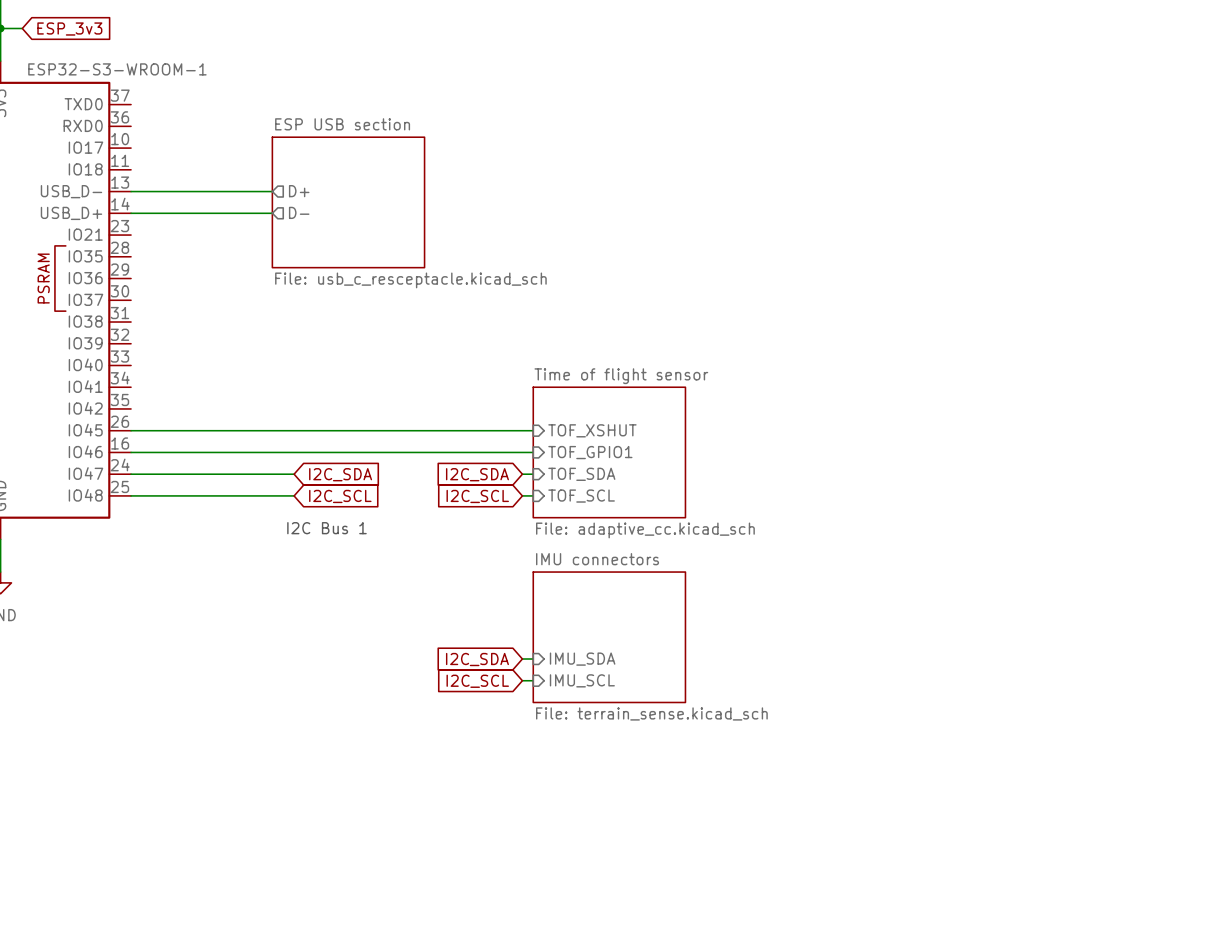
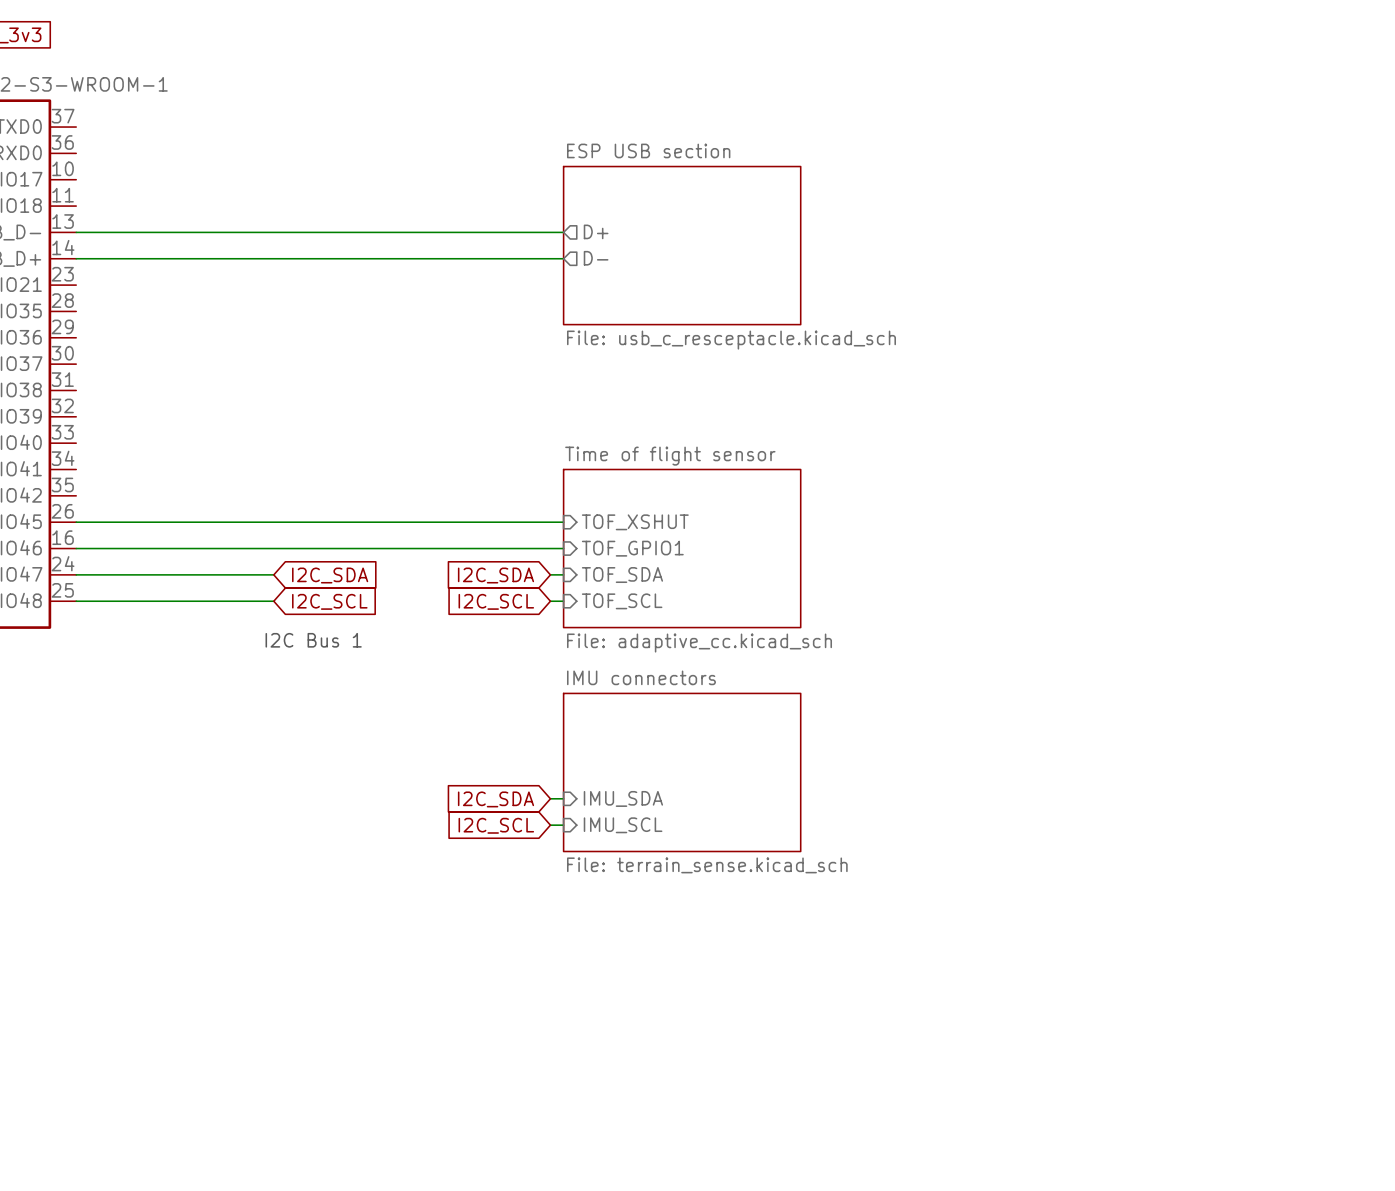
wire: none -> (247, 232) (563, 232)
sheet pin: D+ (299, 191) -> none
sheet pin: none -> D+ (596, 231)
sheet ESP USB section: File: usb_c_resceptacle.kicad_sch (348, 202) -> none
sheet ESP USB section: none -> File: usb_c_resceptacle.kicad_sch (682, 245)
sheet pin: D- (299, 212) -> none
sheet pin: none -> D- (596, 258)
wire: none -> (247, 258) (563, 258)
sheet Time of flight sensor: File: adaptive_cc.kicad_sch (609, 452) -> none
sheet Time of flight sensor: none -> File: adaptive_cc.kicad_sch (682, 548)
sheet IMU connectors: File: terrain_sense.kicad_sch (609, 637) -> none
sheet IMU connectors: none -> File: terrain_sense.kicad_sch (682, 772)

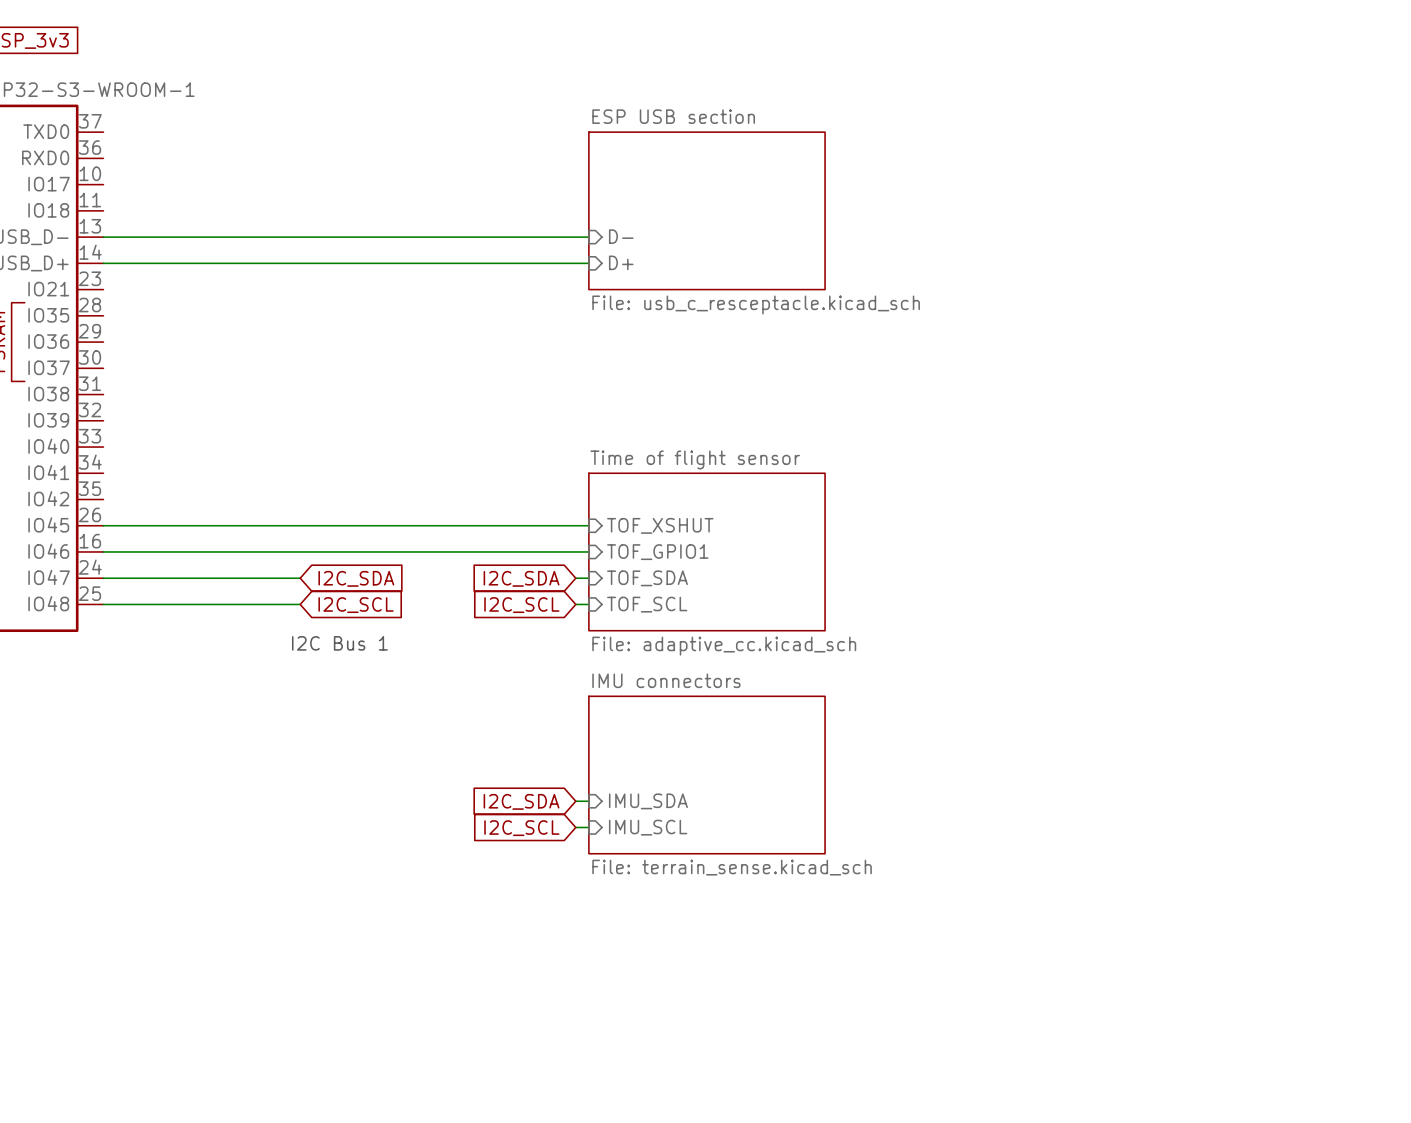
sheet pin shape: output (596, 231) -> input (621, 236)
sheet pin: D+ (596, 231) -> D- (621, 236)
sheet ESP USB section position: (682, 245) -> (706, 210)
sheet pin shape: output (596, 258) -> input (621, 262)
sheet pin: D- (596, 258) -> D+ (621, 262)

